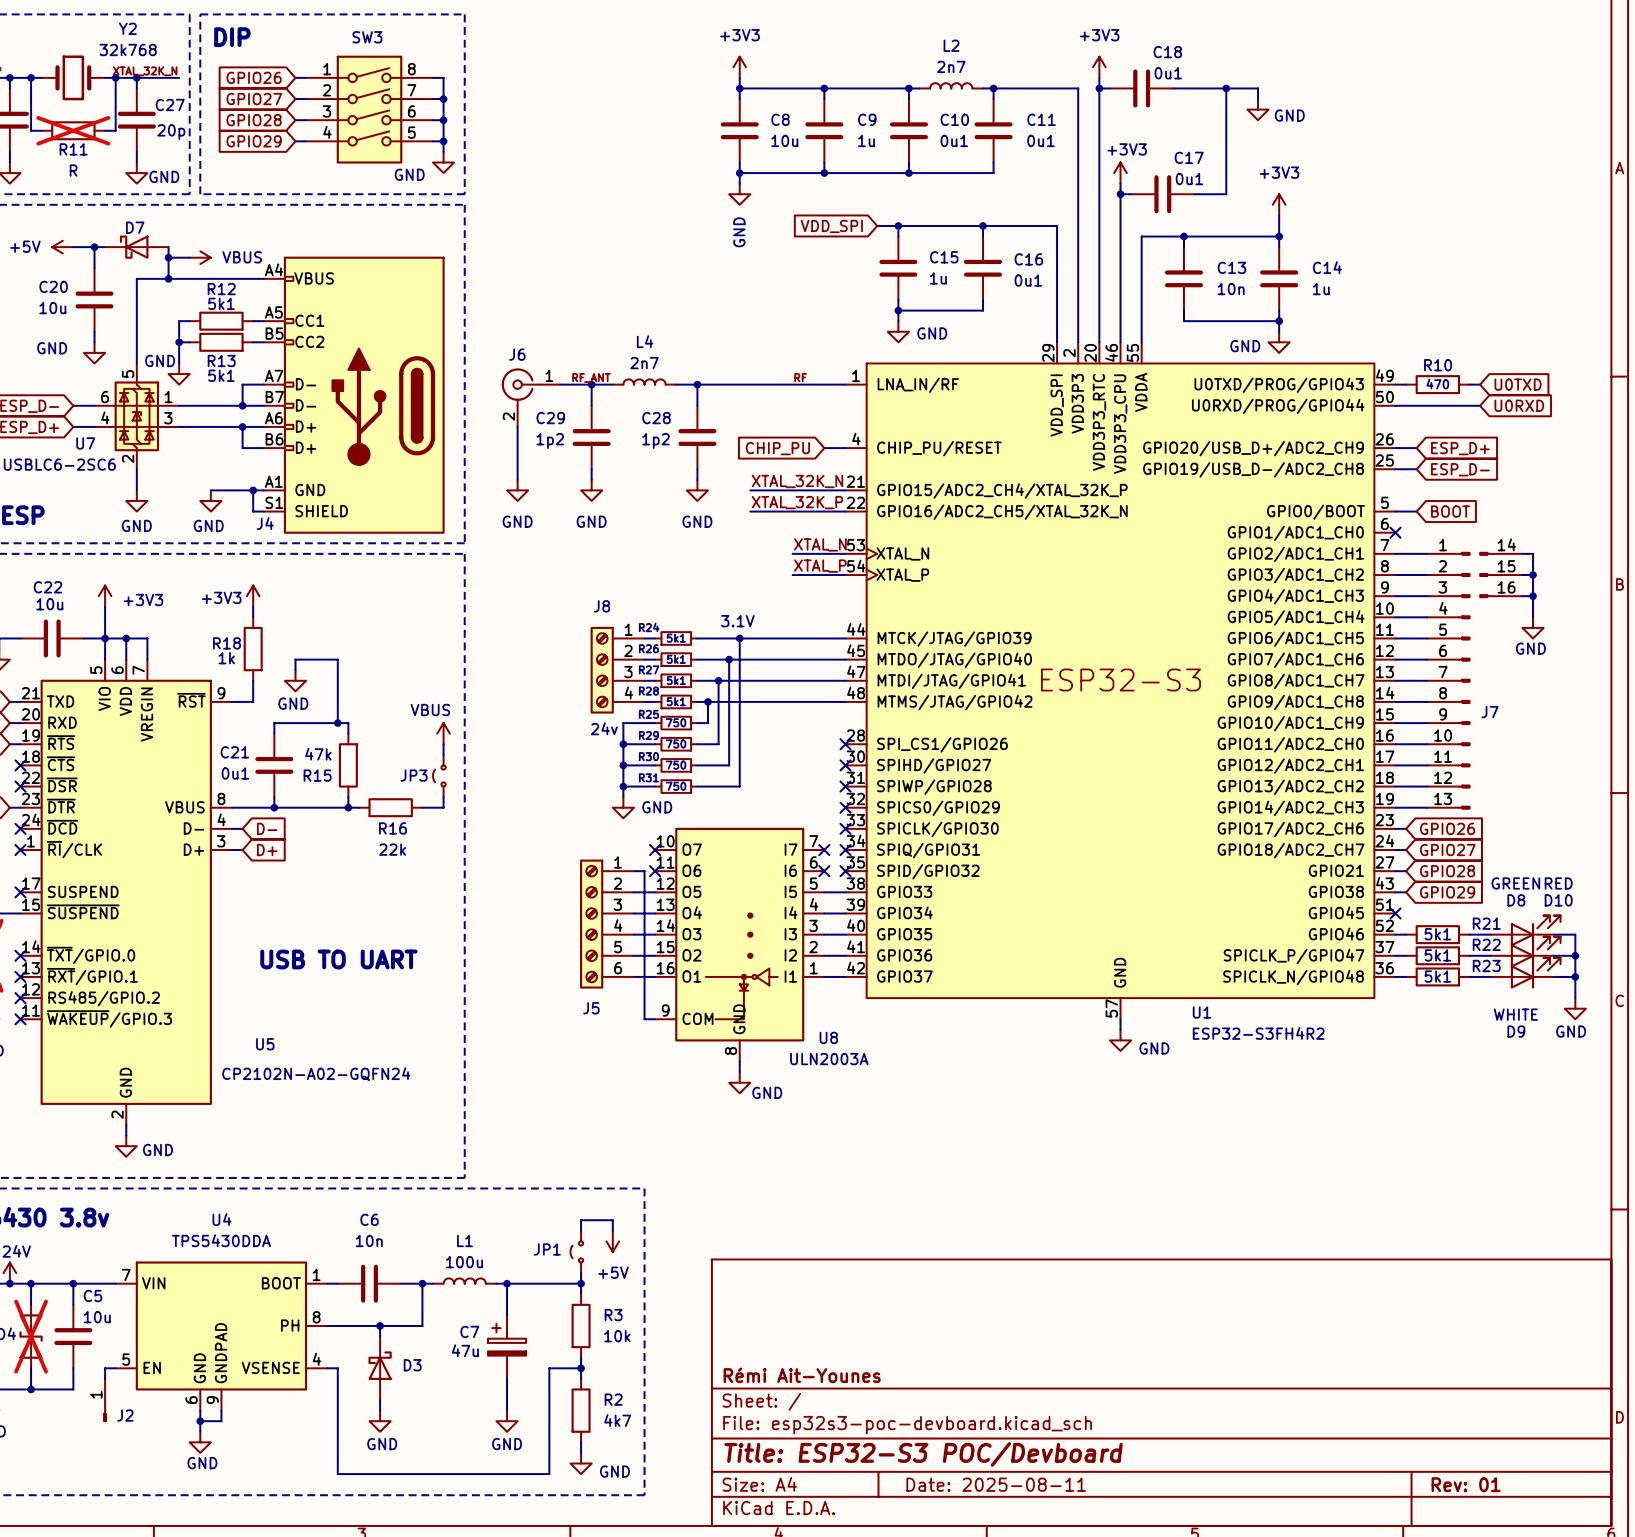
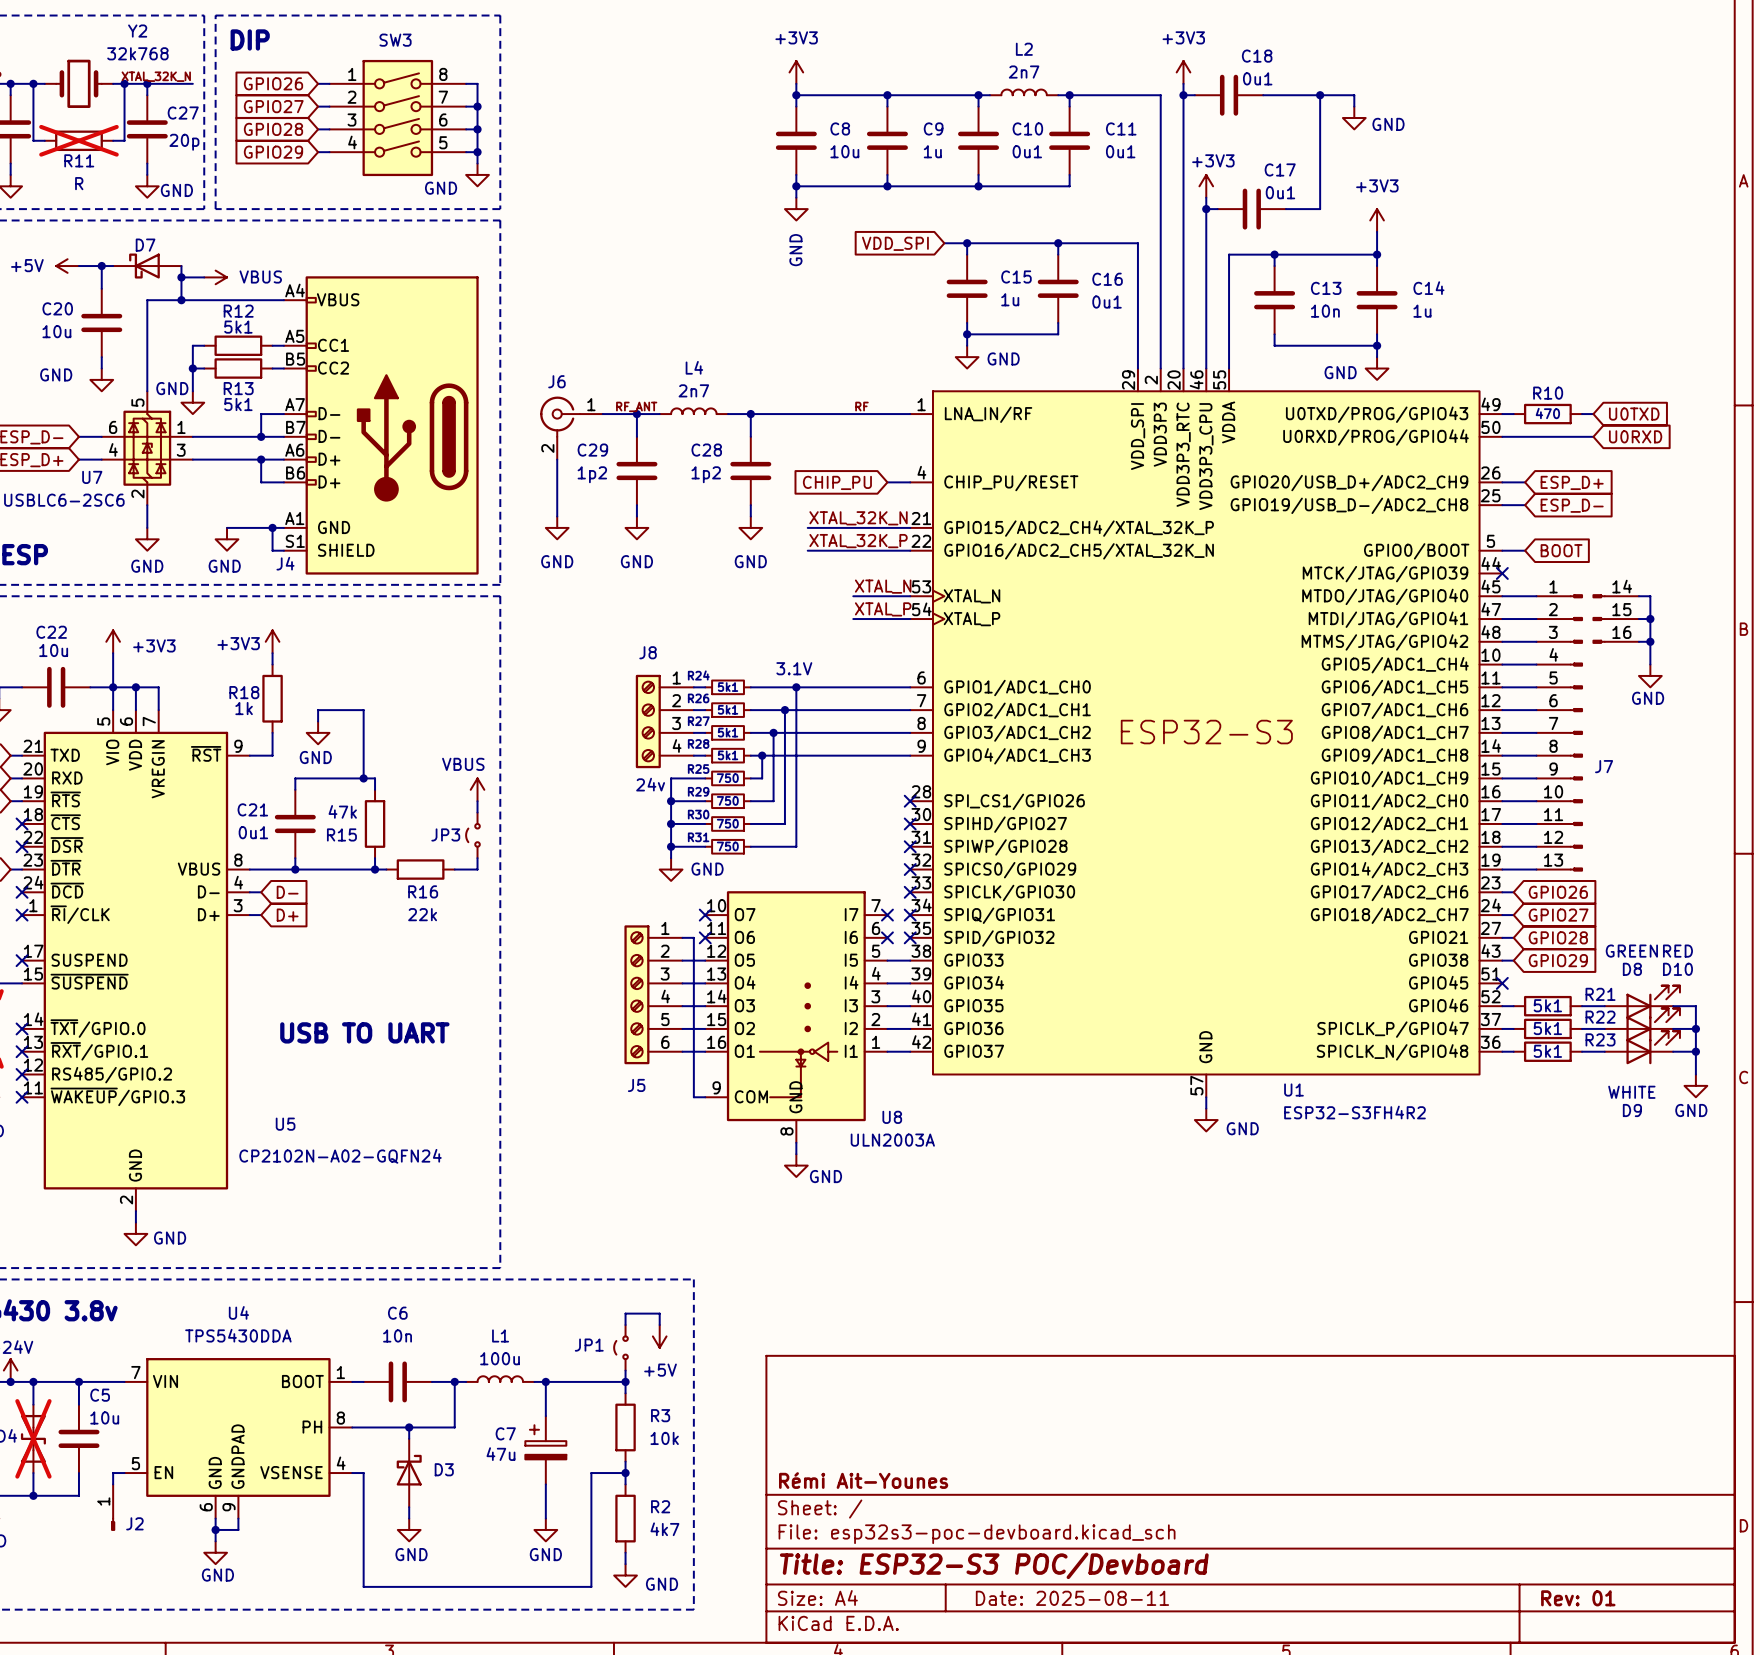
U1 symbol: [845, 342, 1396, 1020] -> [910, 368, 1503, 1098]

